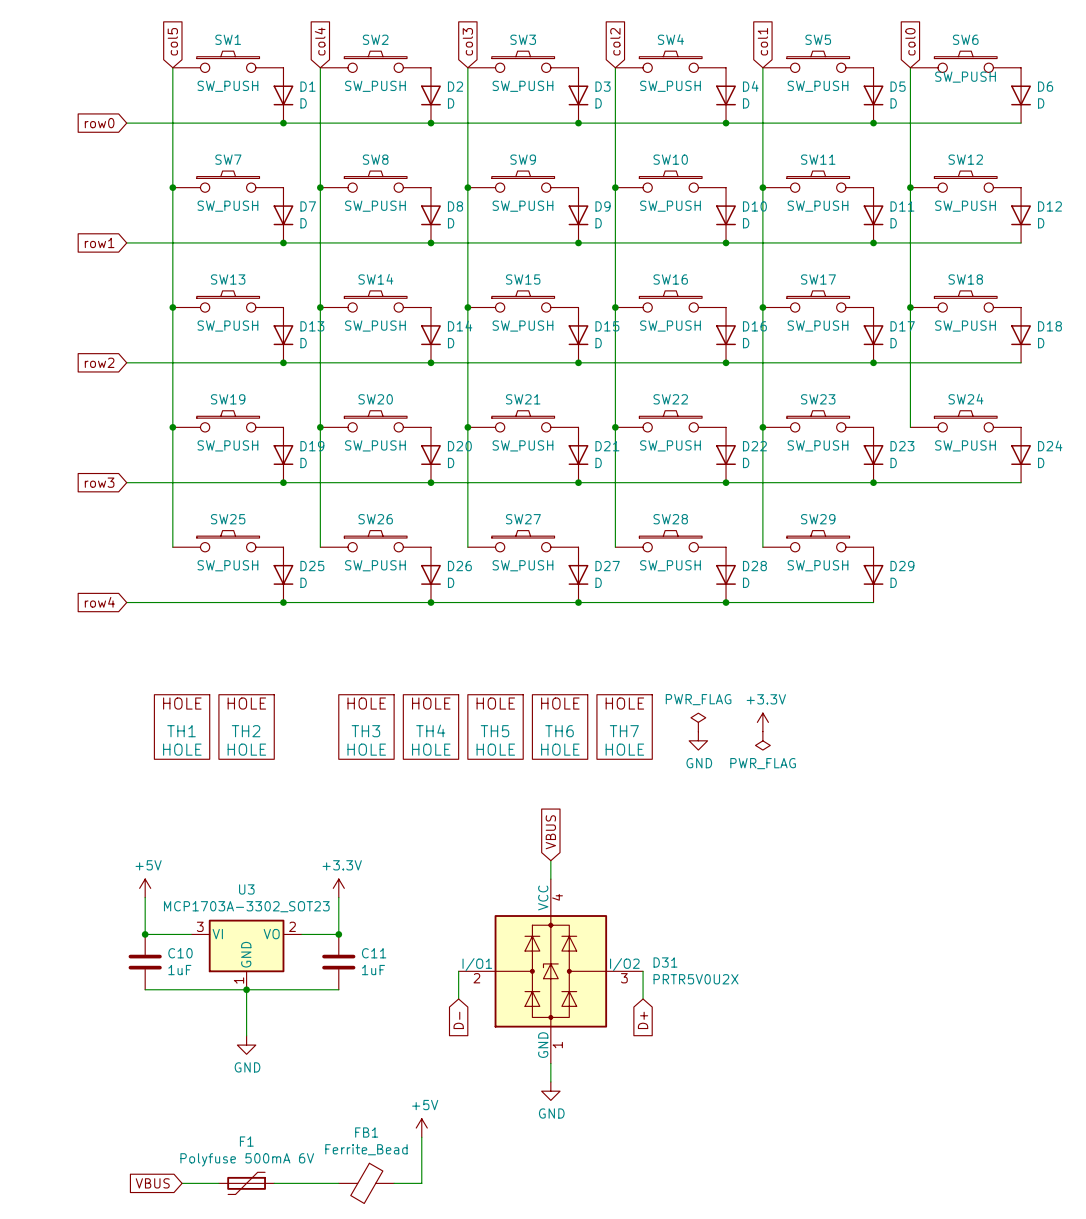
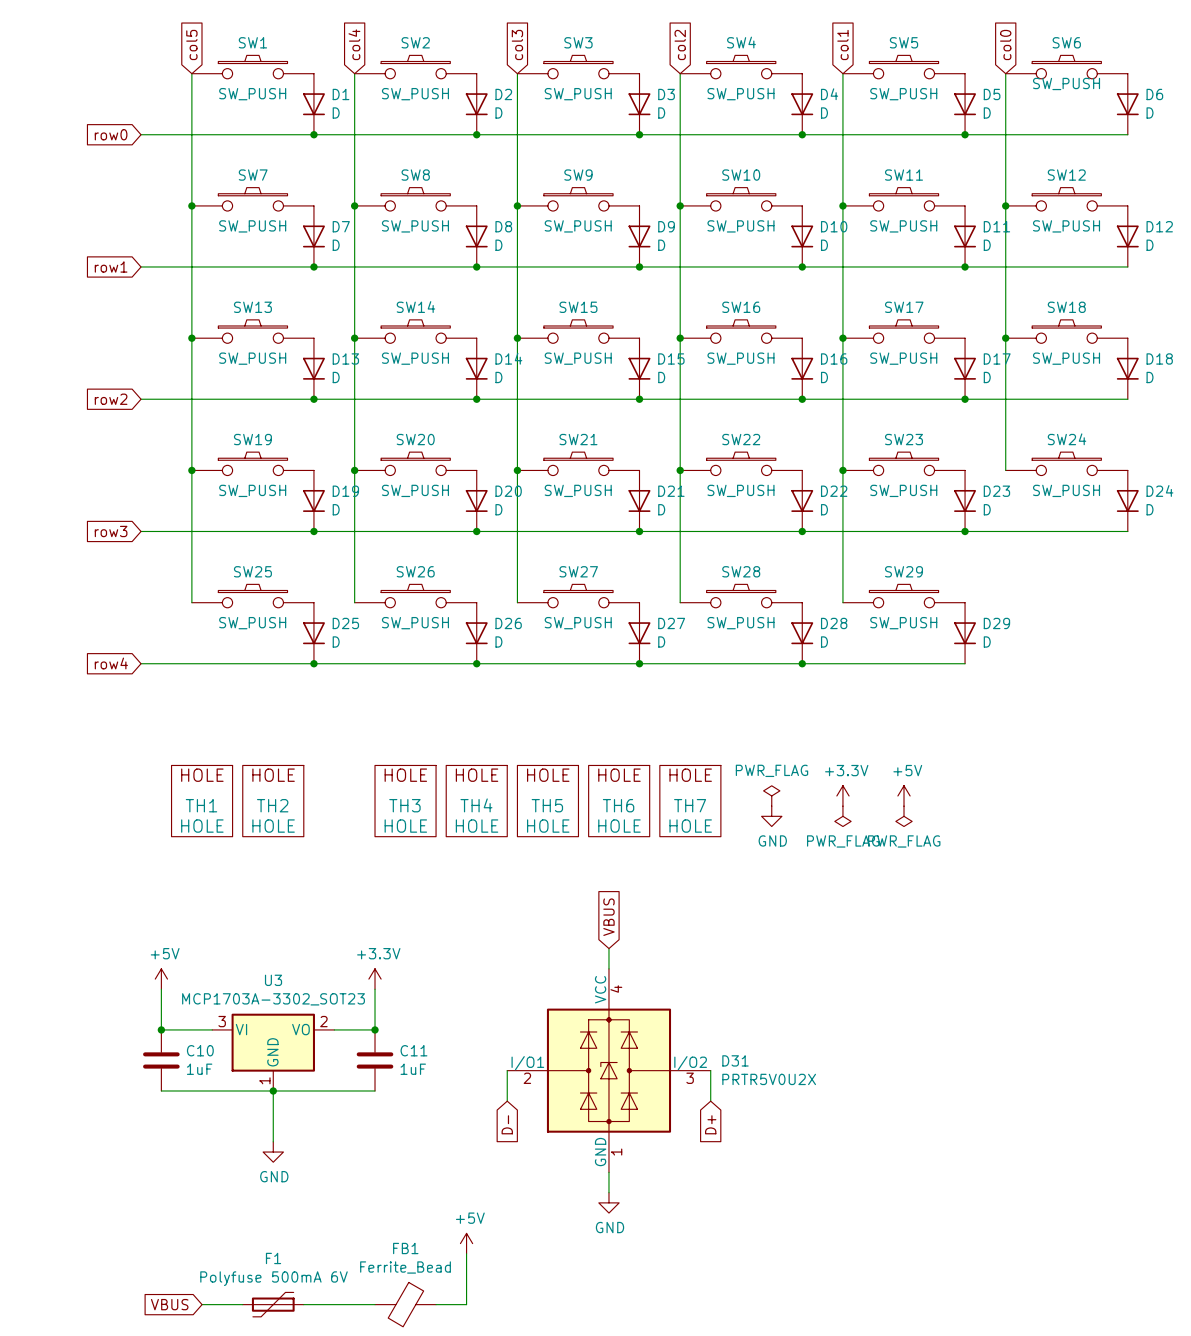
power symbol: none -> +5V (904, 795)
power symbol: none -> PWR_FLAG (904, 816)

